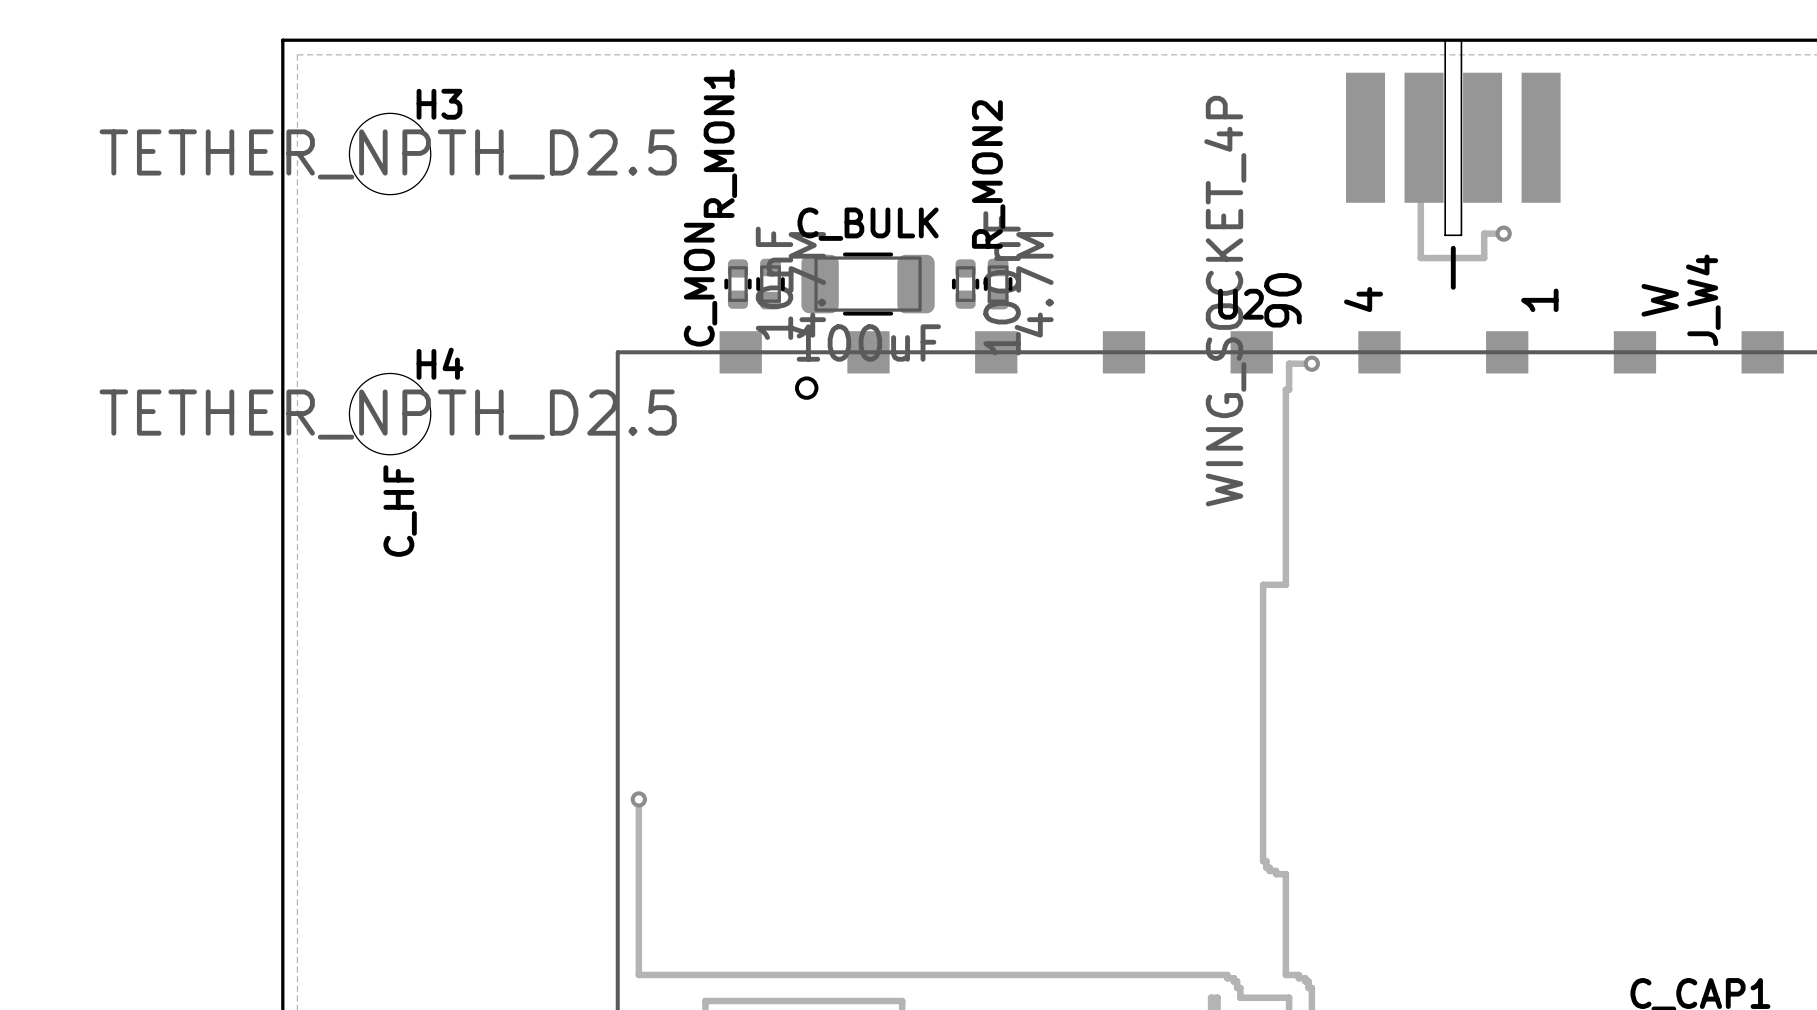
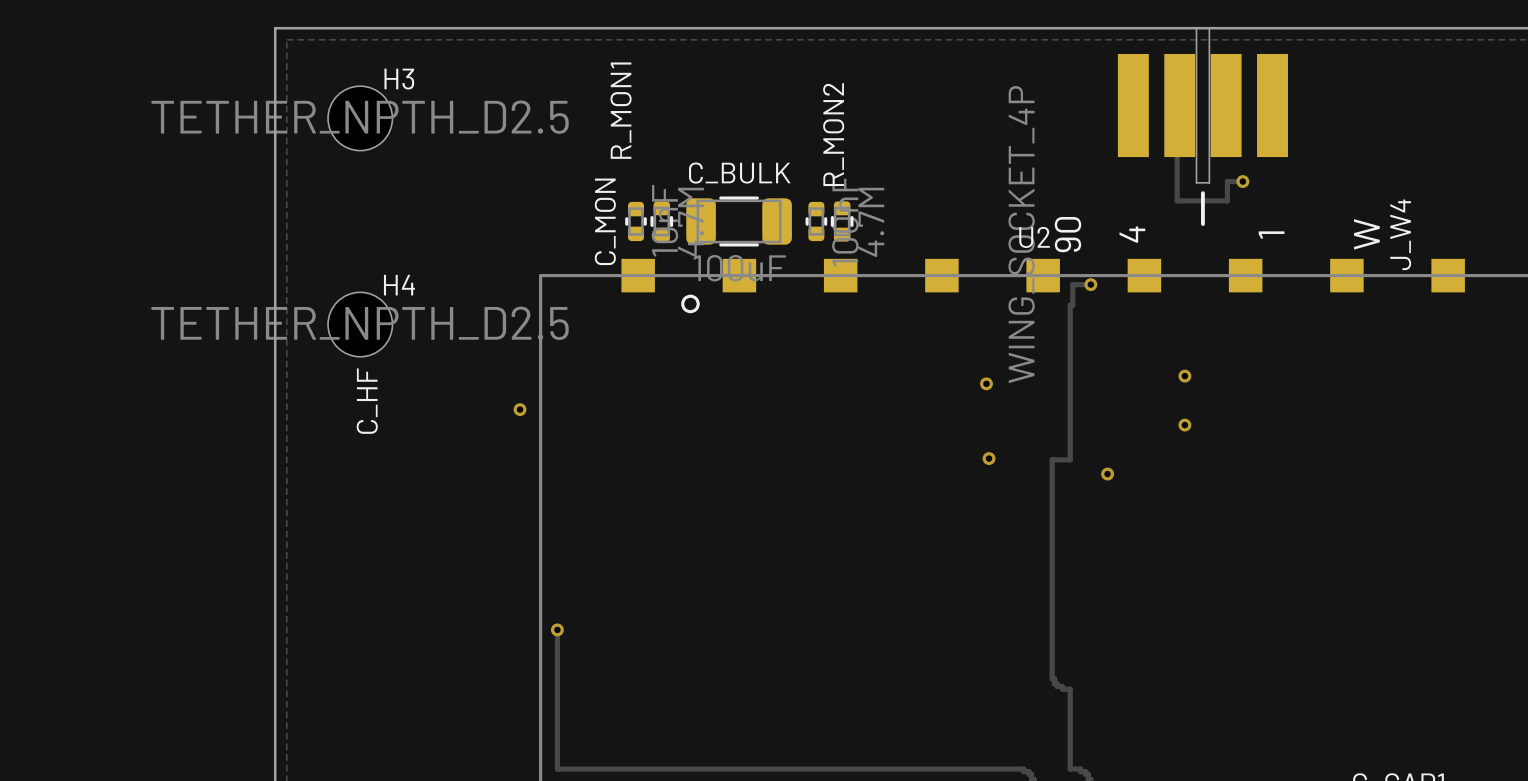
via: none -> (1184, 376)
via: none -> (986, 383)
via: none -> (520, 409)
via: none -> (1184, 425)
via: none -> (989, 458)
via: none -> (1107, 474)

